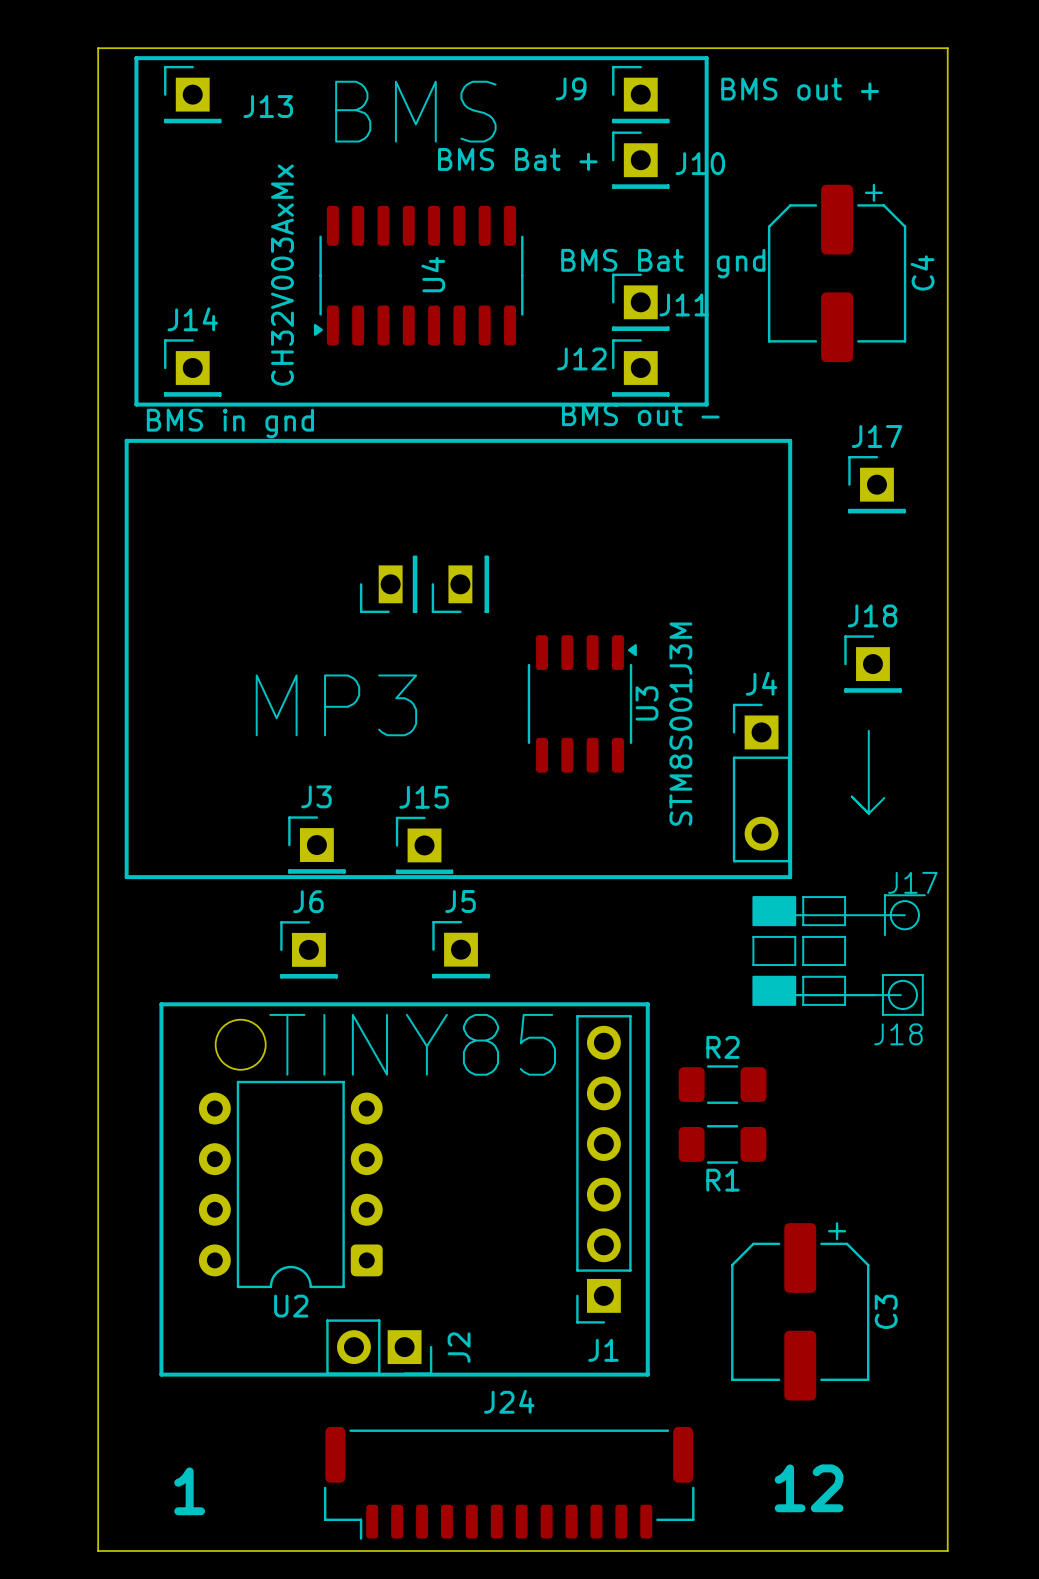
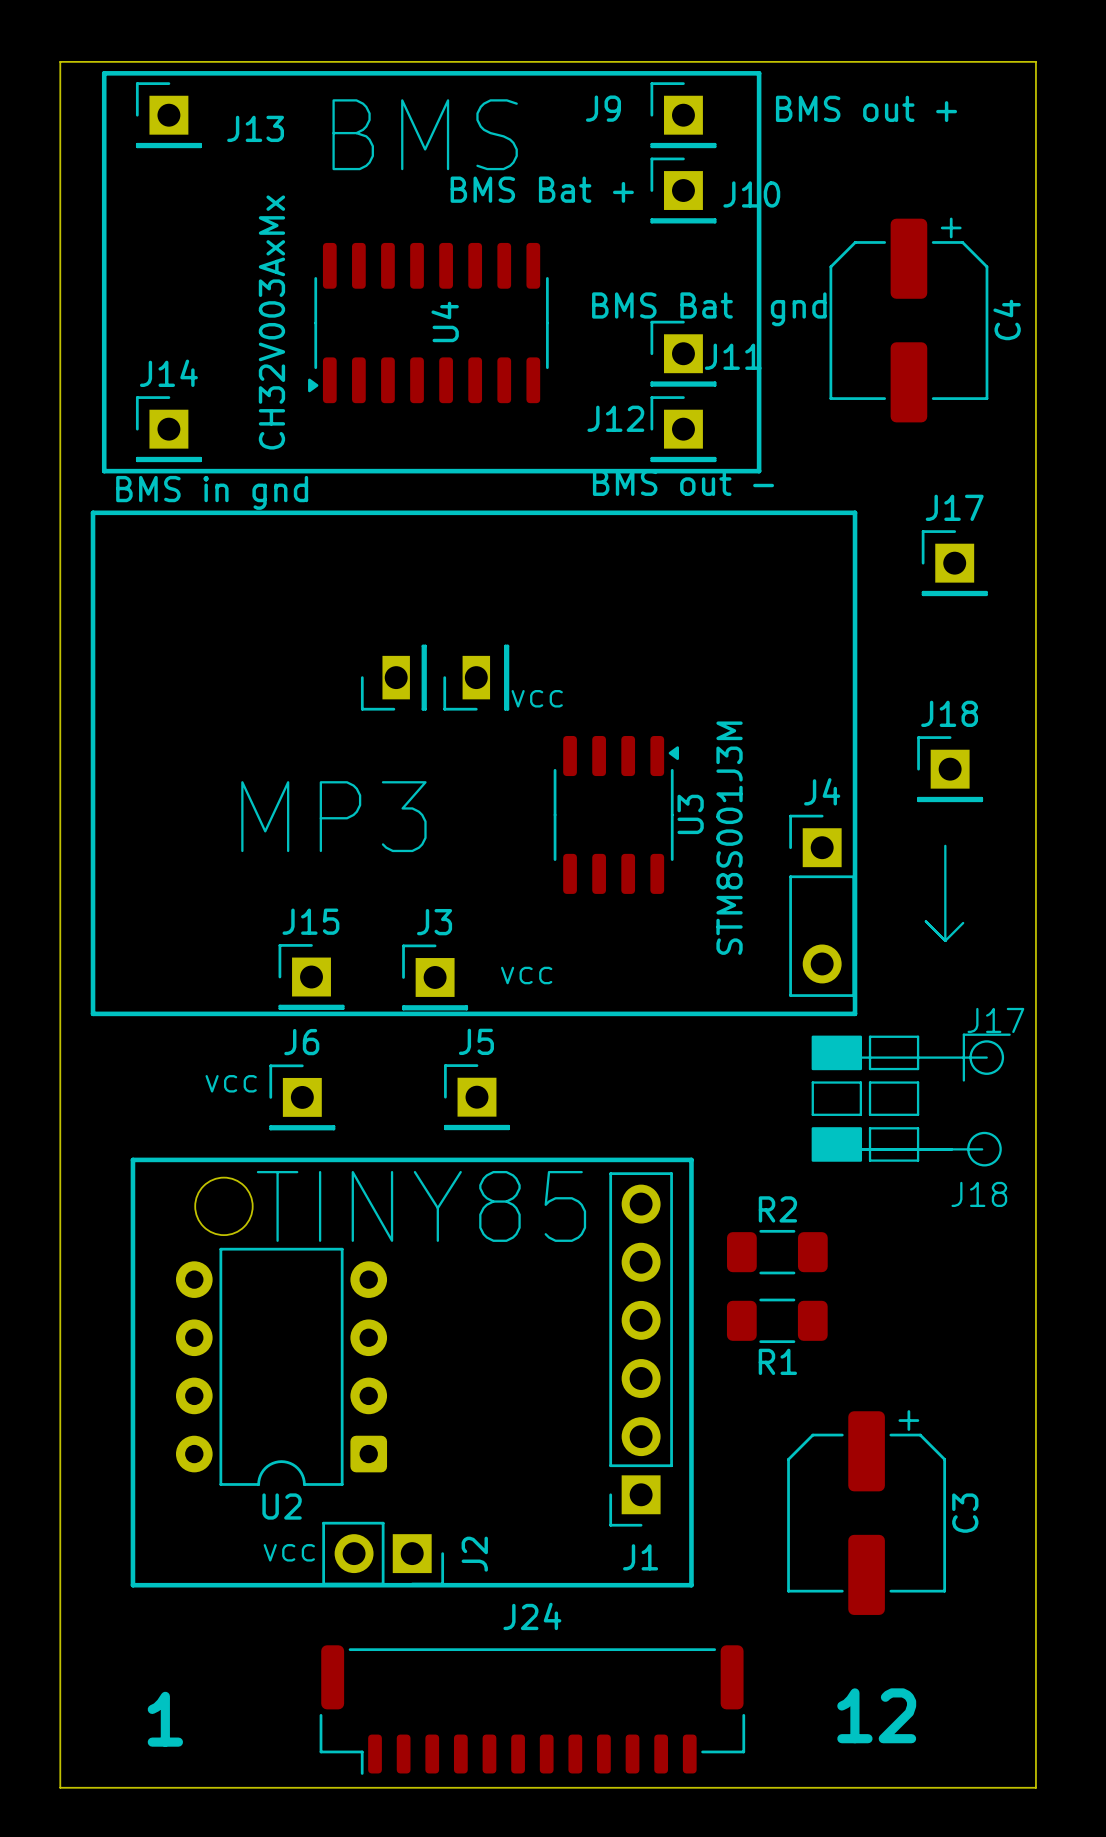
text: none -> vcc (537, 698)
J3 name: J3 (316, 796) -> J15 (310, 921)
J15 name: J15 (424, 797) -> J3 (434, 922)
text: none -> vcc (526, 975)
text: none -> vcc (231, 1083)
line: (882, 974) (922, 974) (922, 1014) (882, 1014) (882, 974) -> none
text: none -> vcc (289, 1552)

